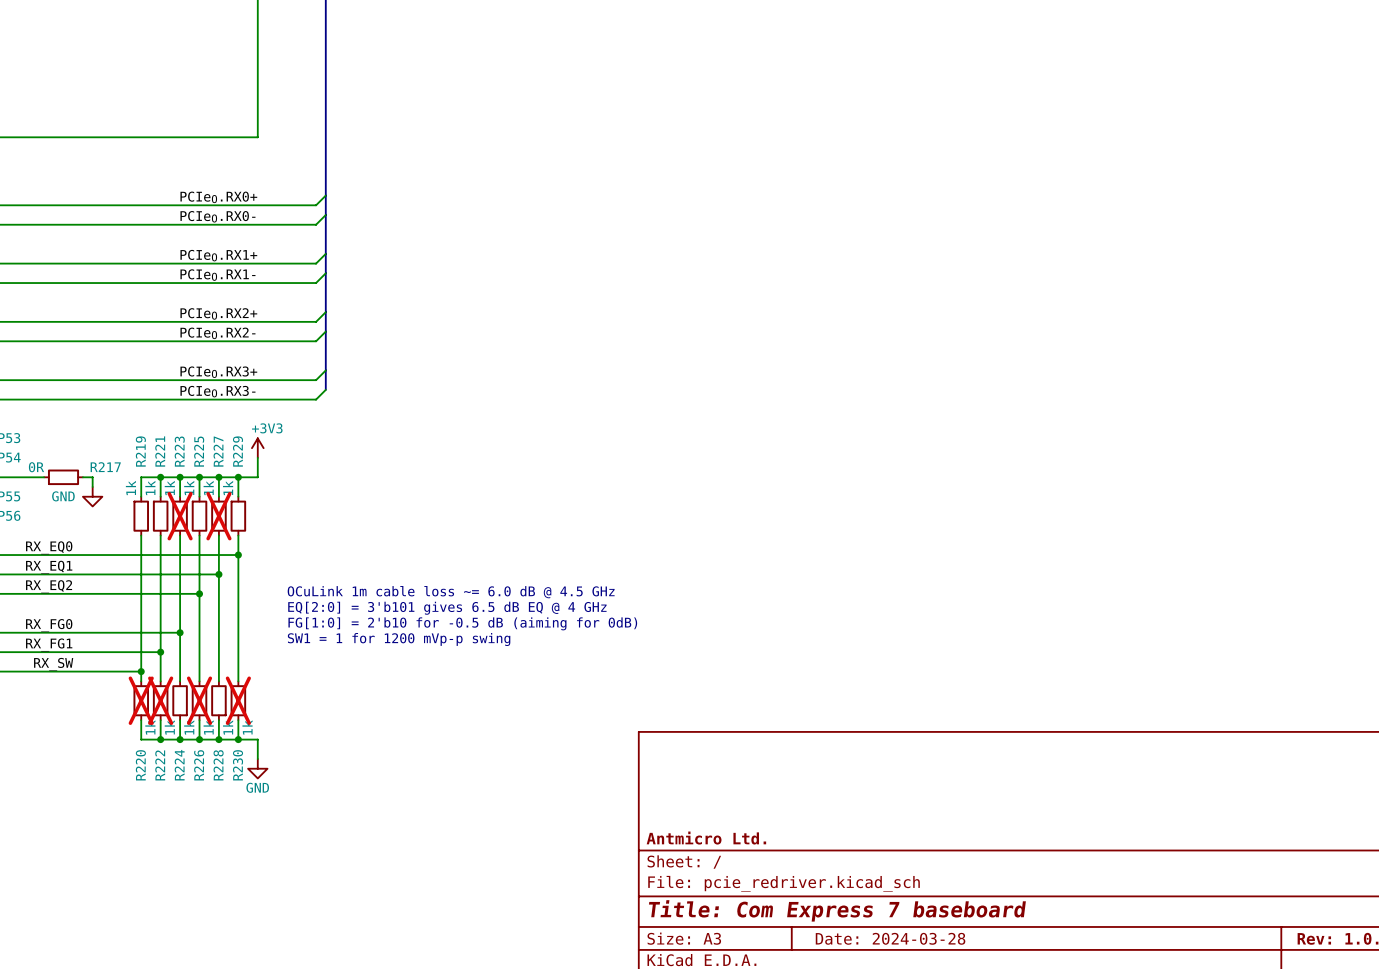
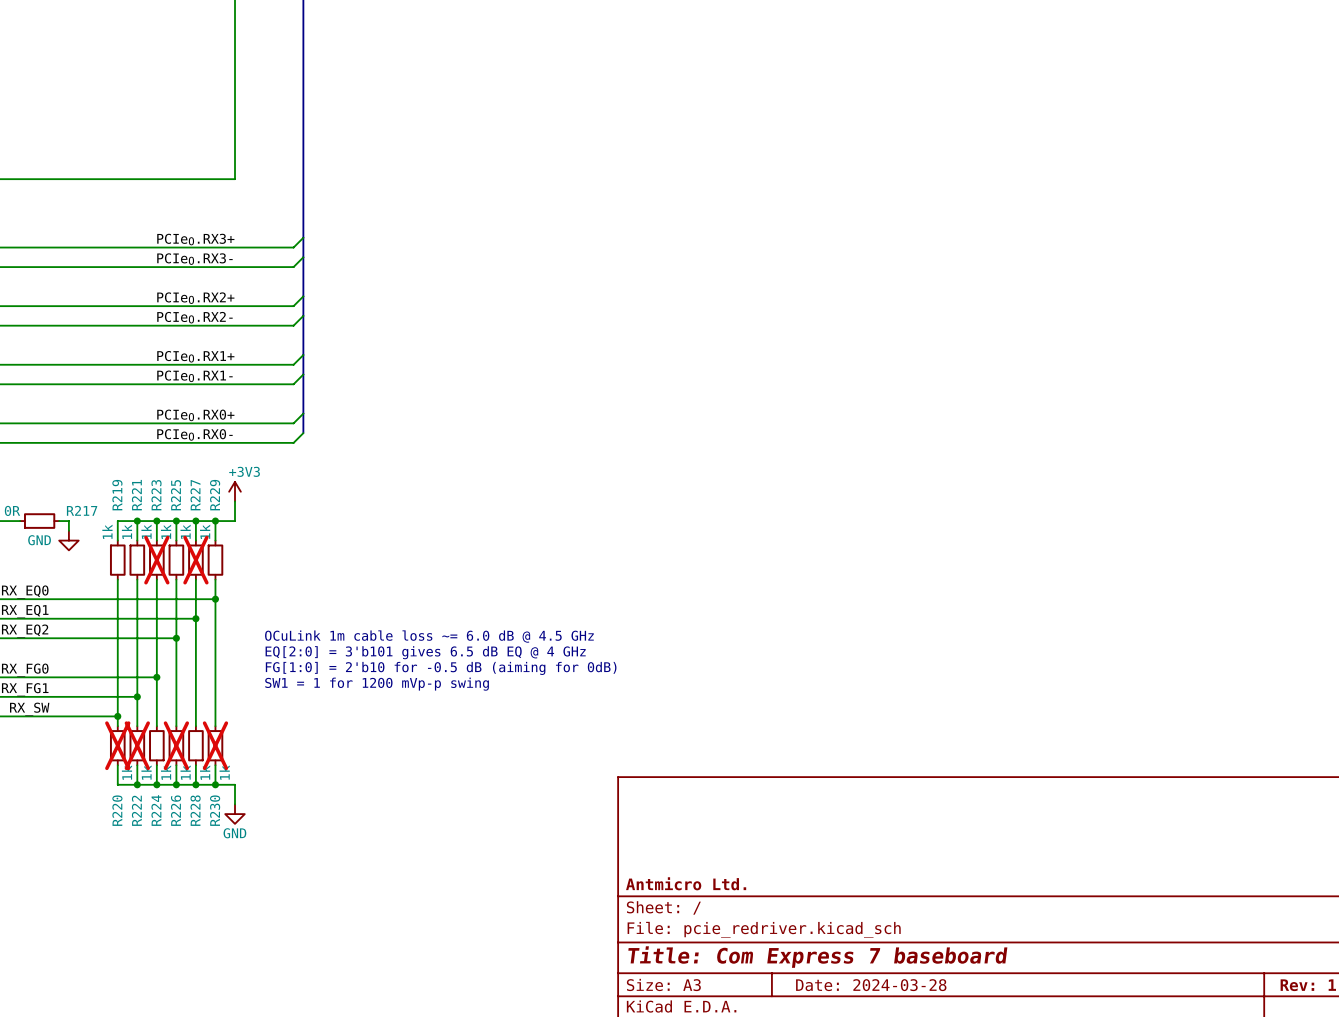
label: PCIeO.RX0+ (218, 197) -> PCIeO.RX3+ (195, 239)
label: PCIeO.RX0- (217, 216) -> PCIeO.RX3- (194, 259)
label: PCIeO.RX1+ (218, 255) -> PCIeO.RX2+ (195, 298)
label: PCIeO.RX1- (217, 275) -> PCIeO.RX2- (194, 317)
label: PCIeO.RX2+ (218, 313) -> PCIeO.RX1+ (195, 356)
label: PCIeO.RX2- (217, 333) -> PCIeO.RX1- (194, 376)
label: PCIeO.RX3+ (218, 372) -> PCIeO.RX0+ (195, 415)
label: PCIeO.RX3- (217, 391) -> PCIeO.RX0- (194, 434)

